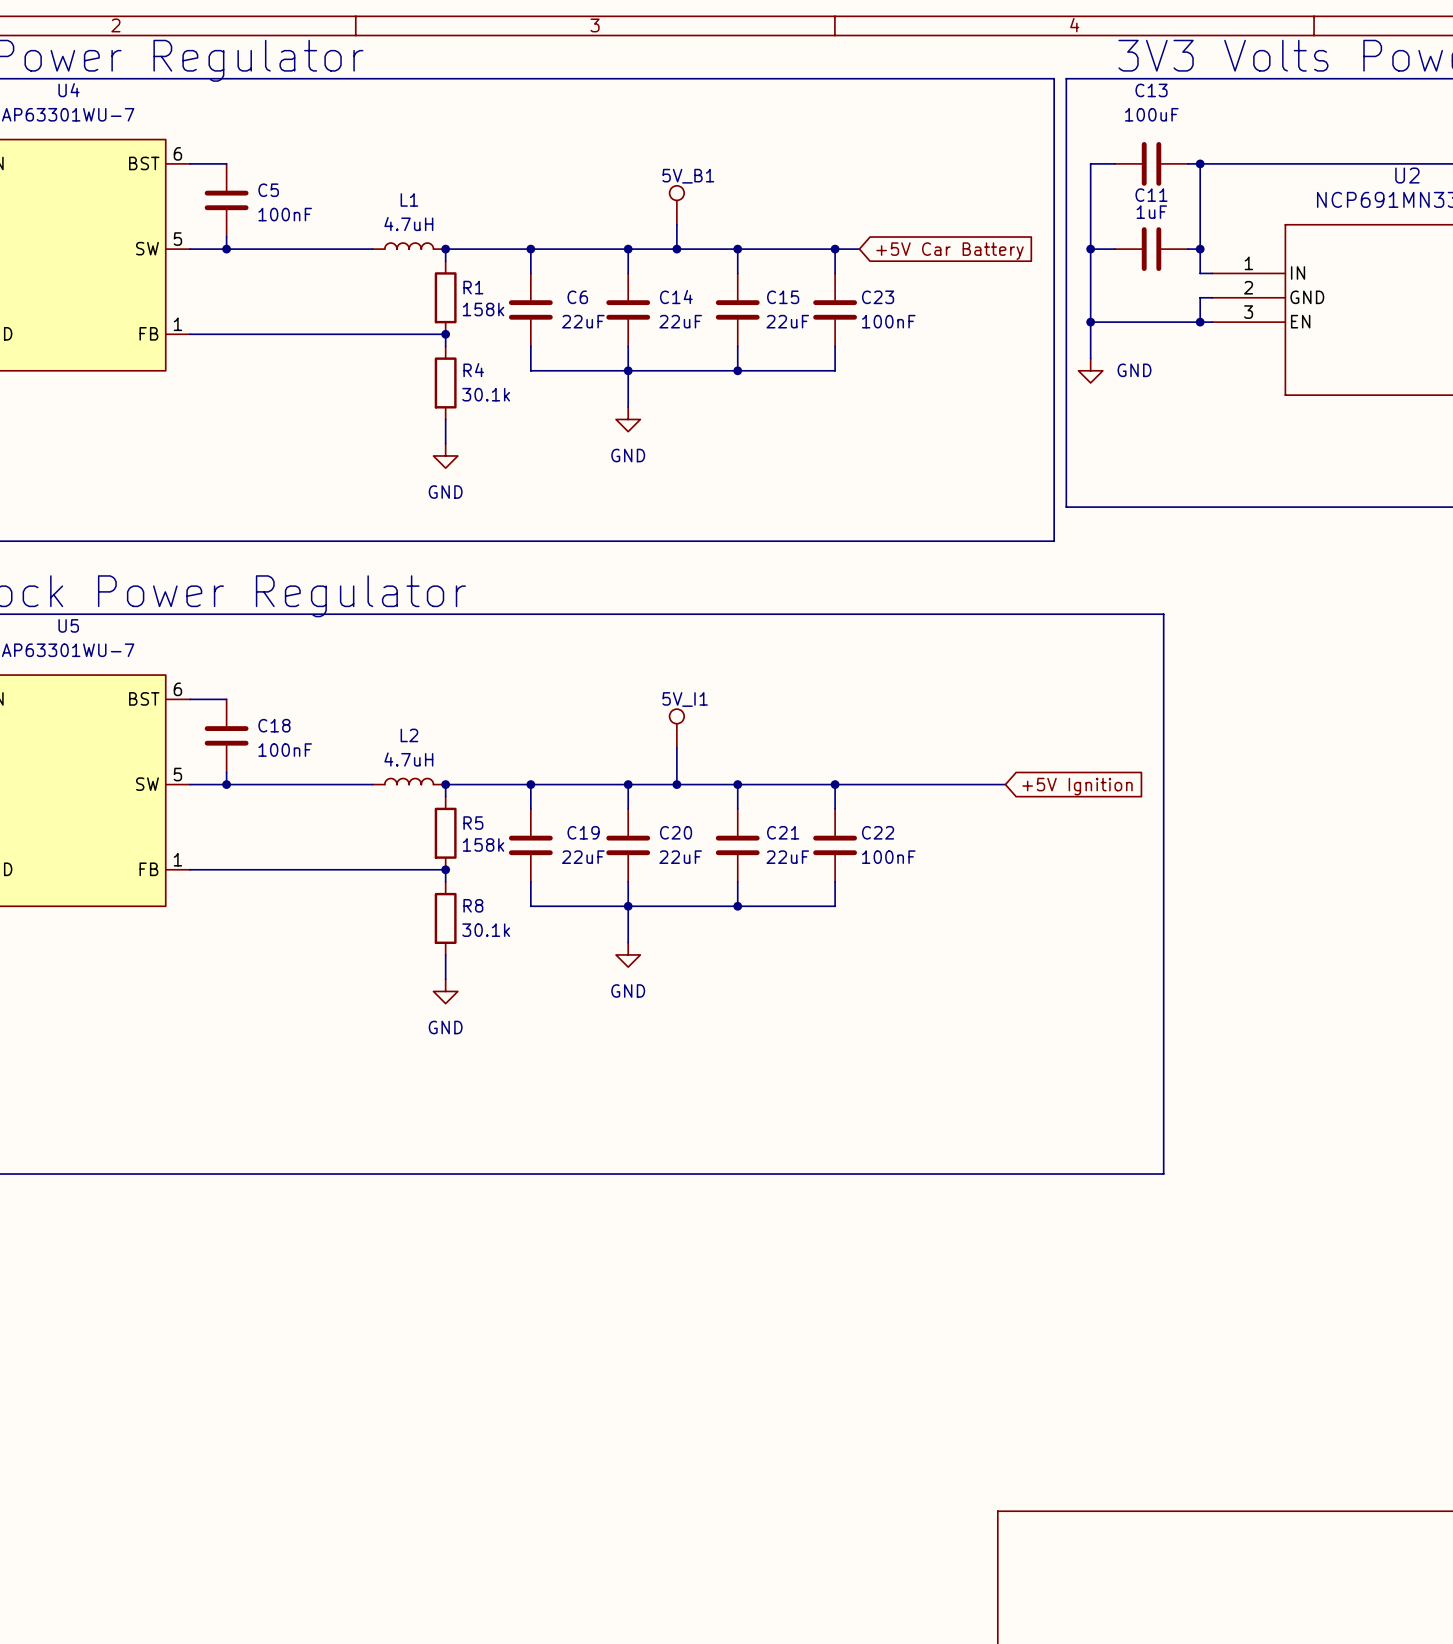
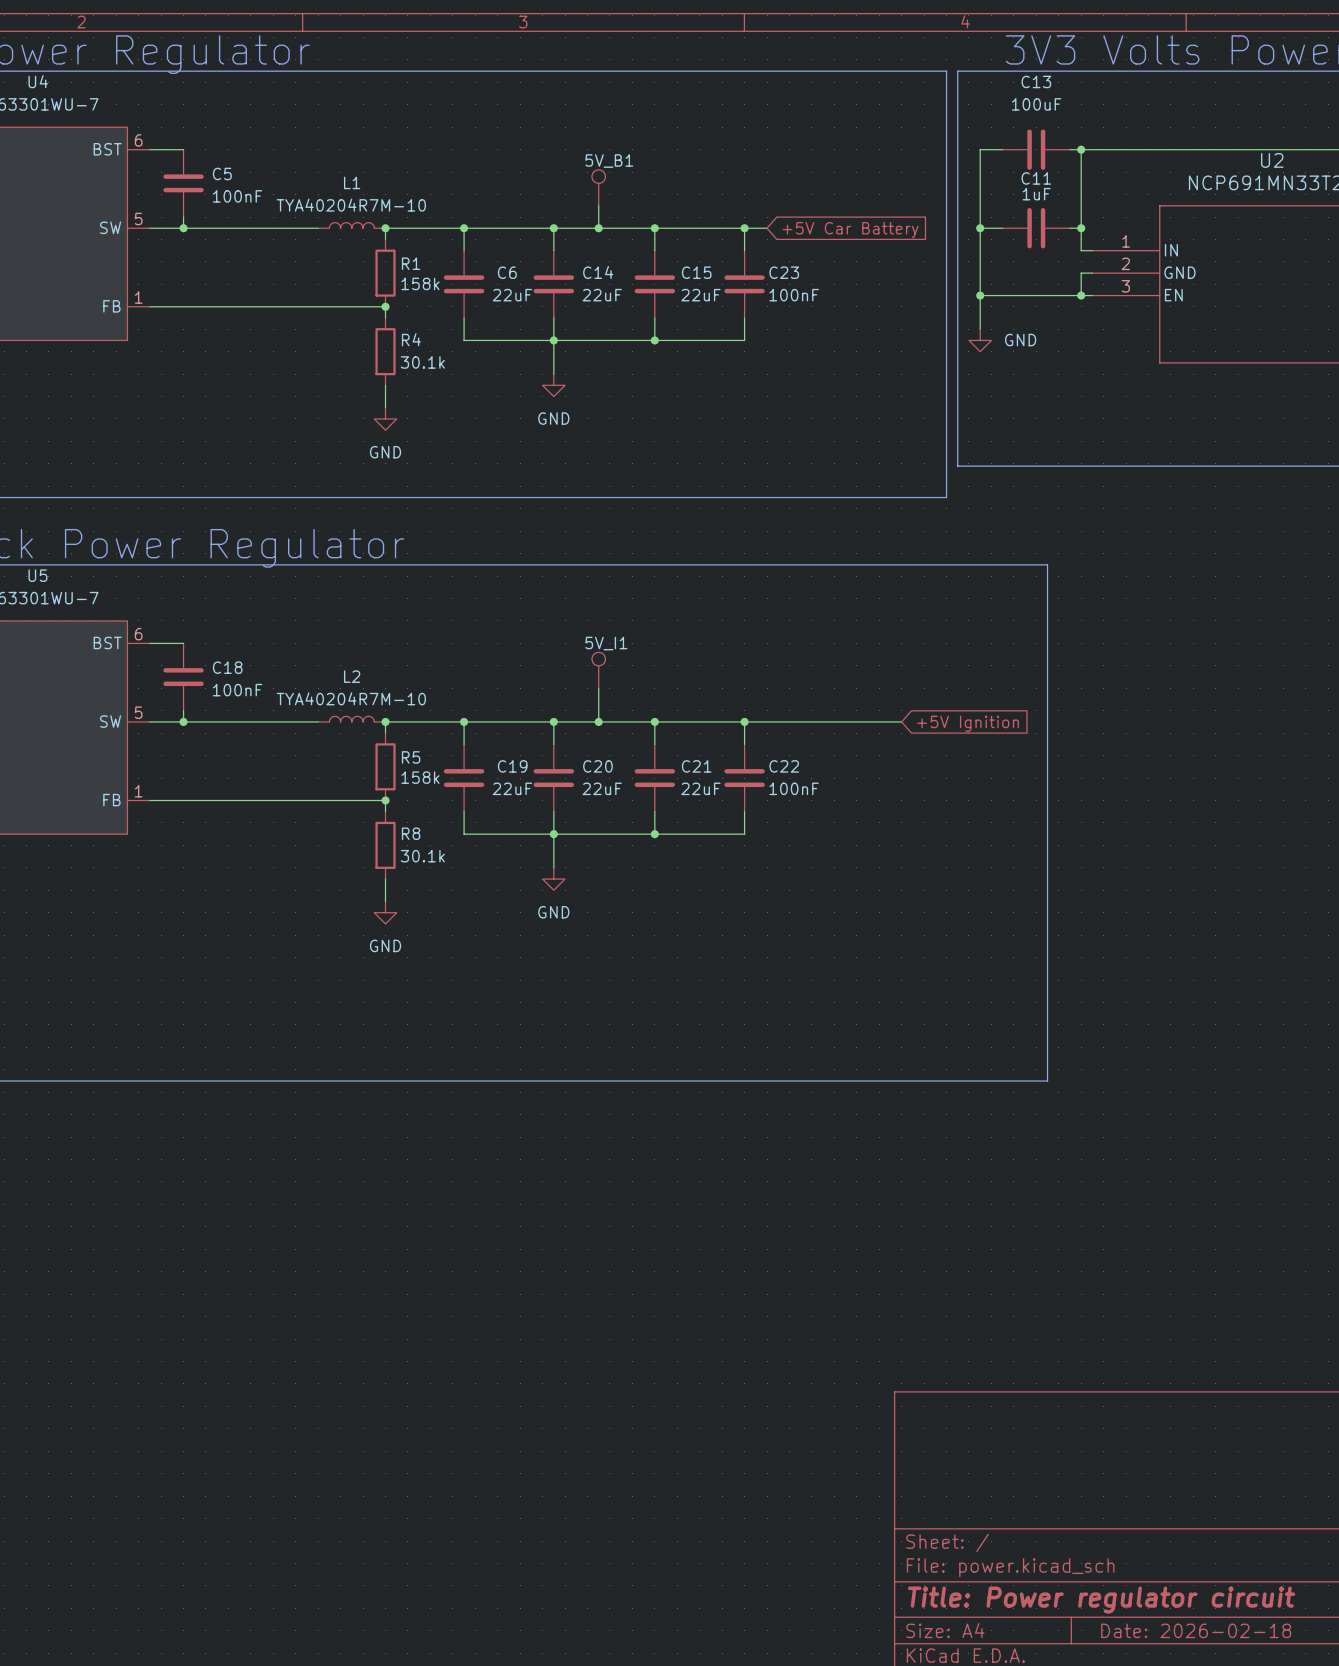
L1 value: 4.7uH (408, 224) -> TYA40204R7M-10 (351, 205)
L2 value: 4.7uH (408, 759) -> TYA40204R7M-10 (351, 698)

